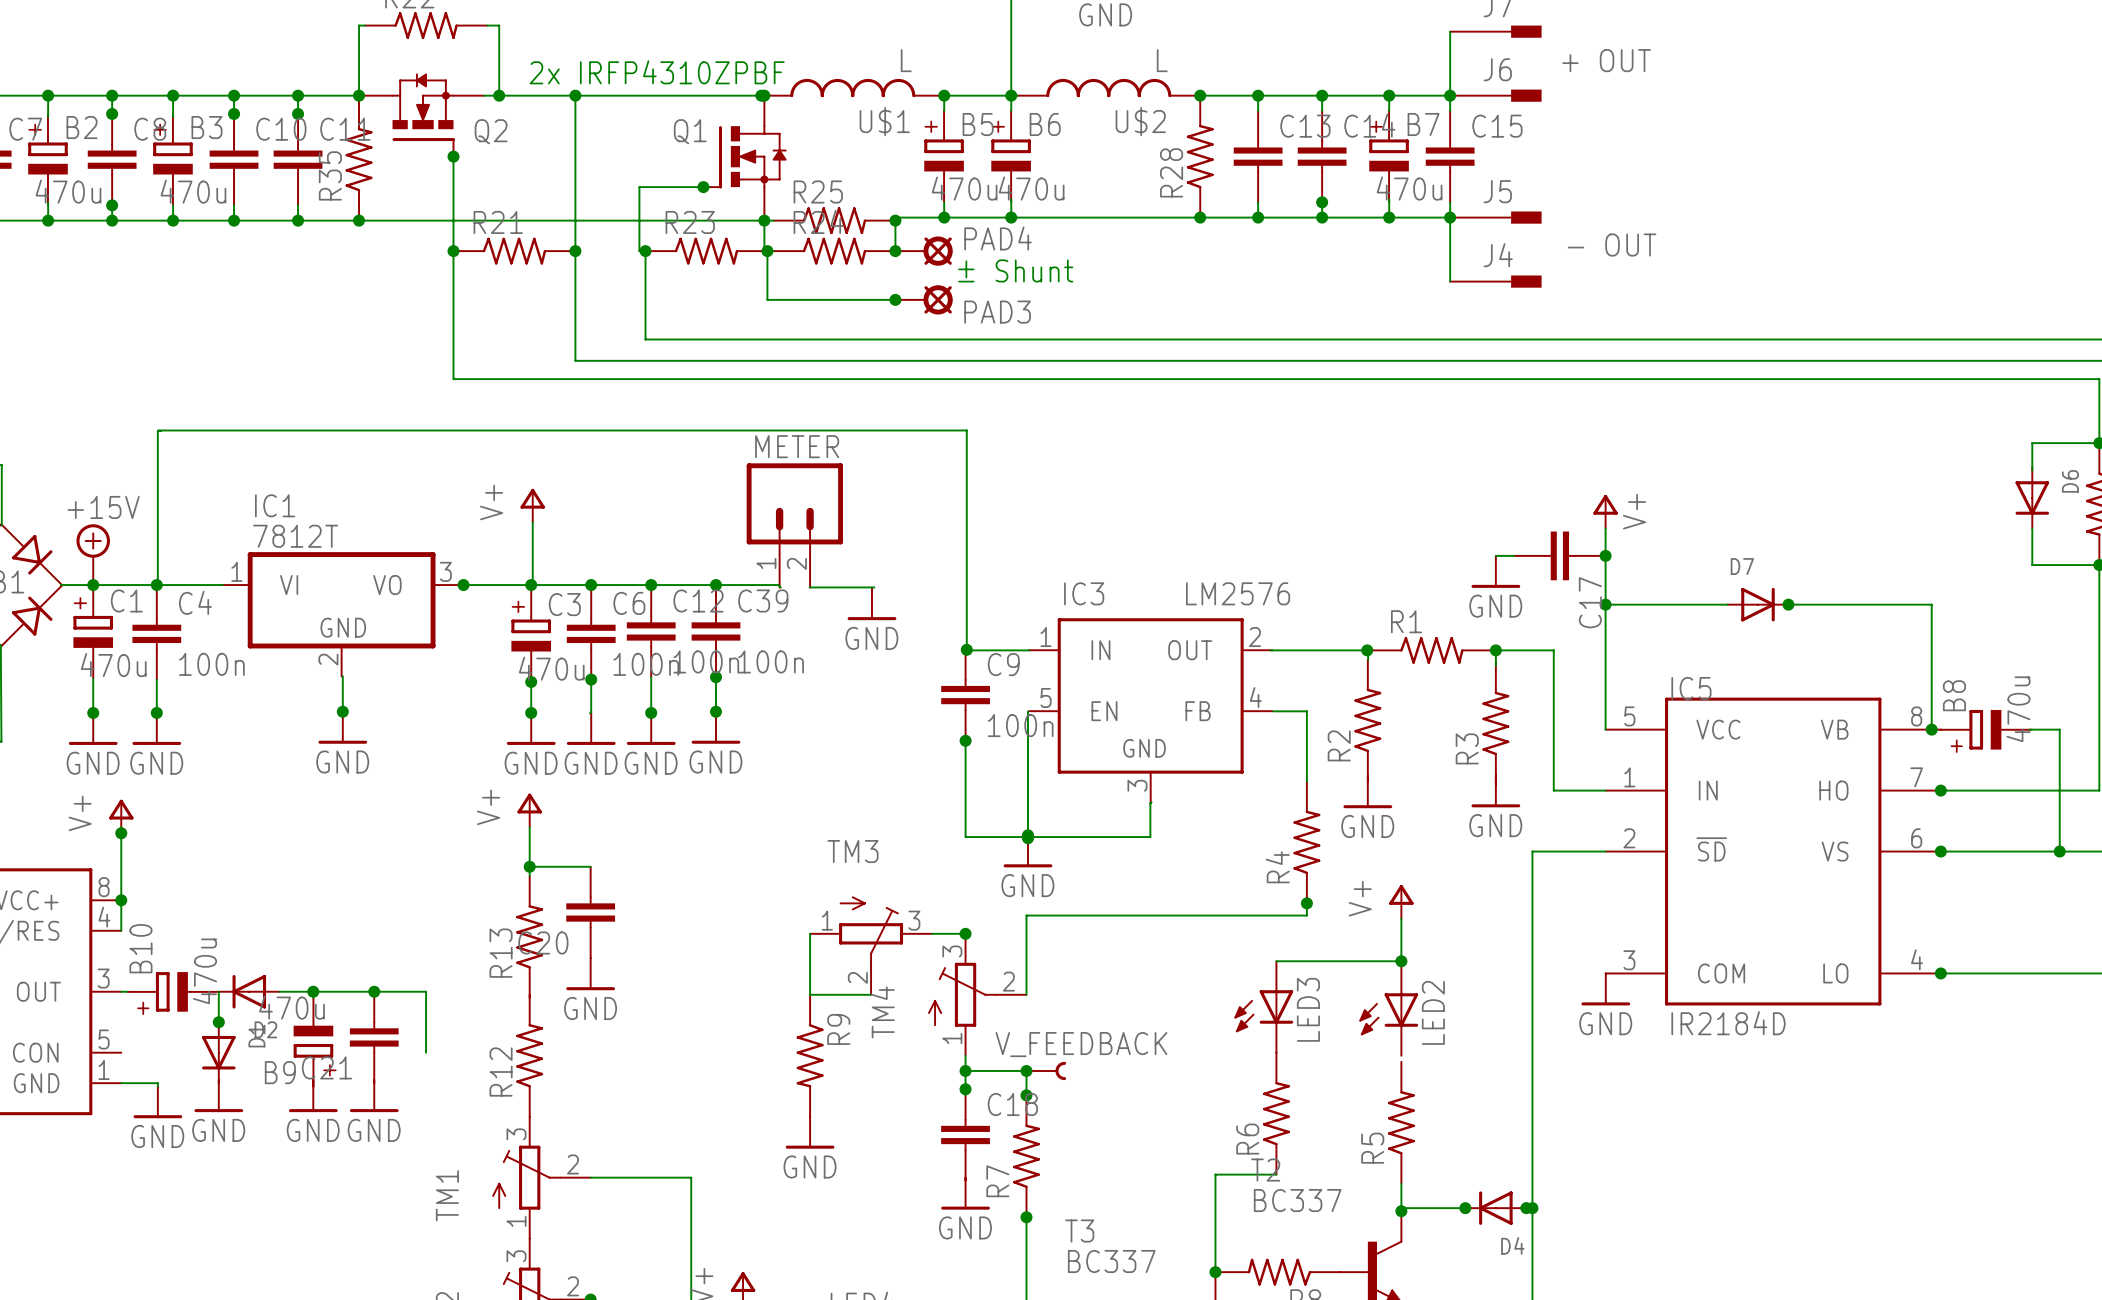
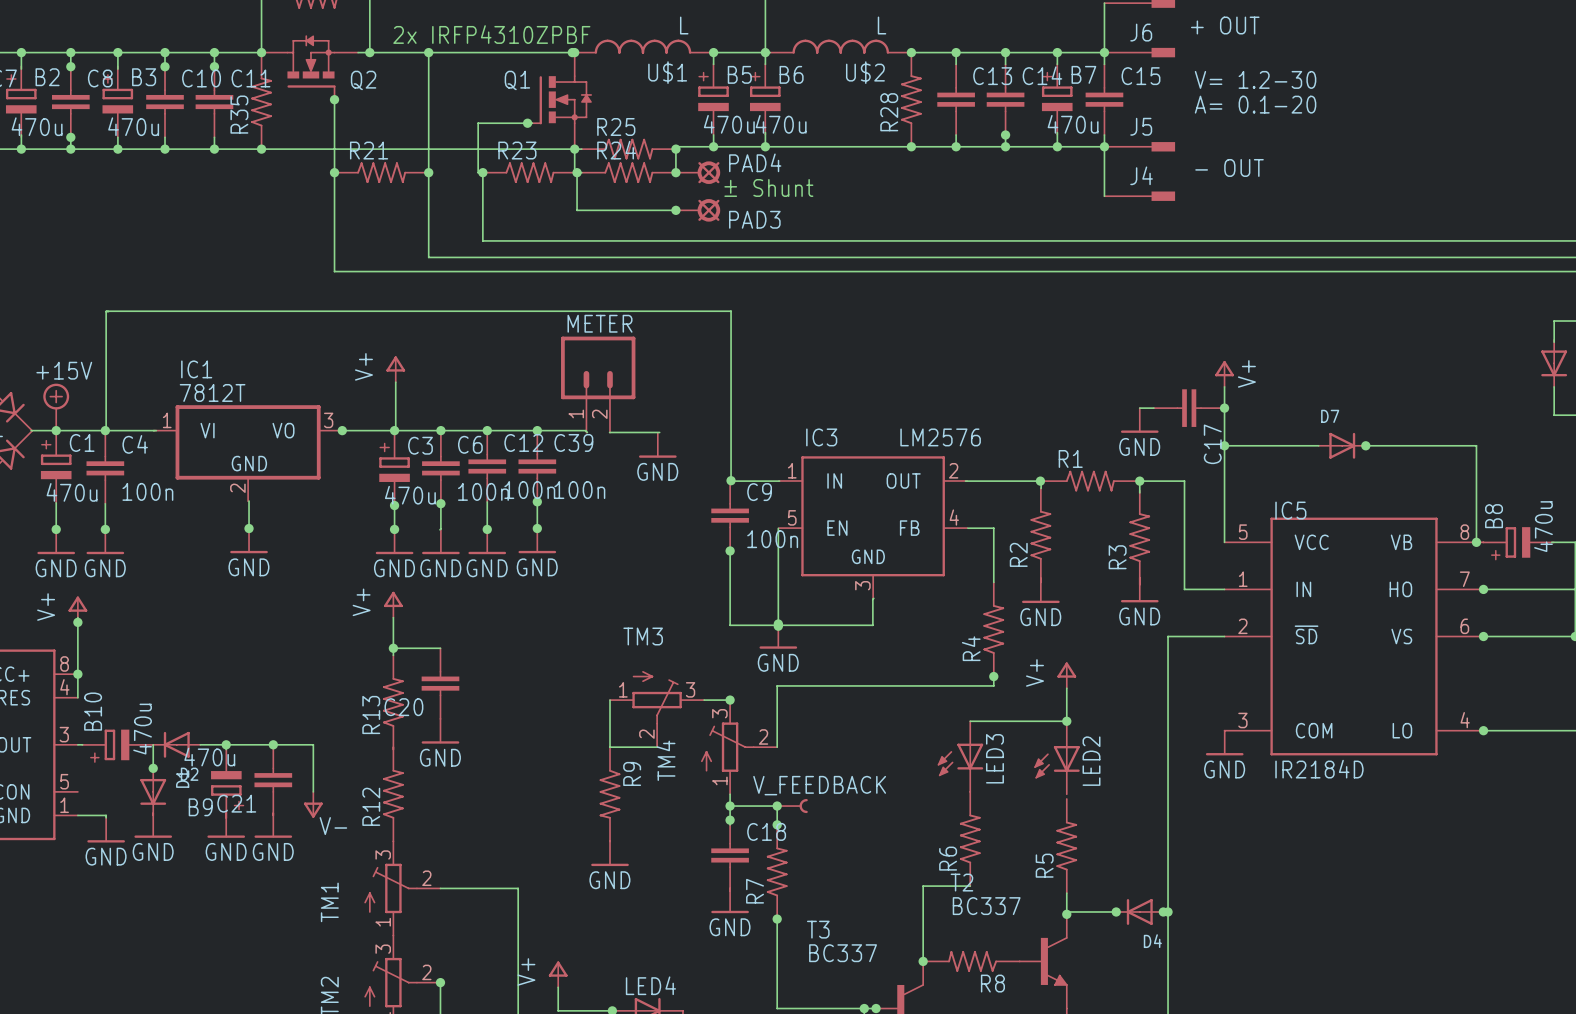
text: none -> V= 1.2-30 (1255, 79)
text: none -> A= 0.1-20 (1255, 104)
power symbol: none -> V- (313, 804)

